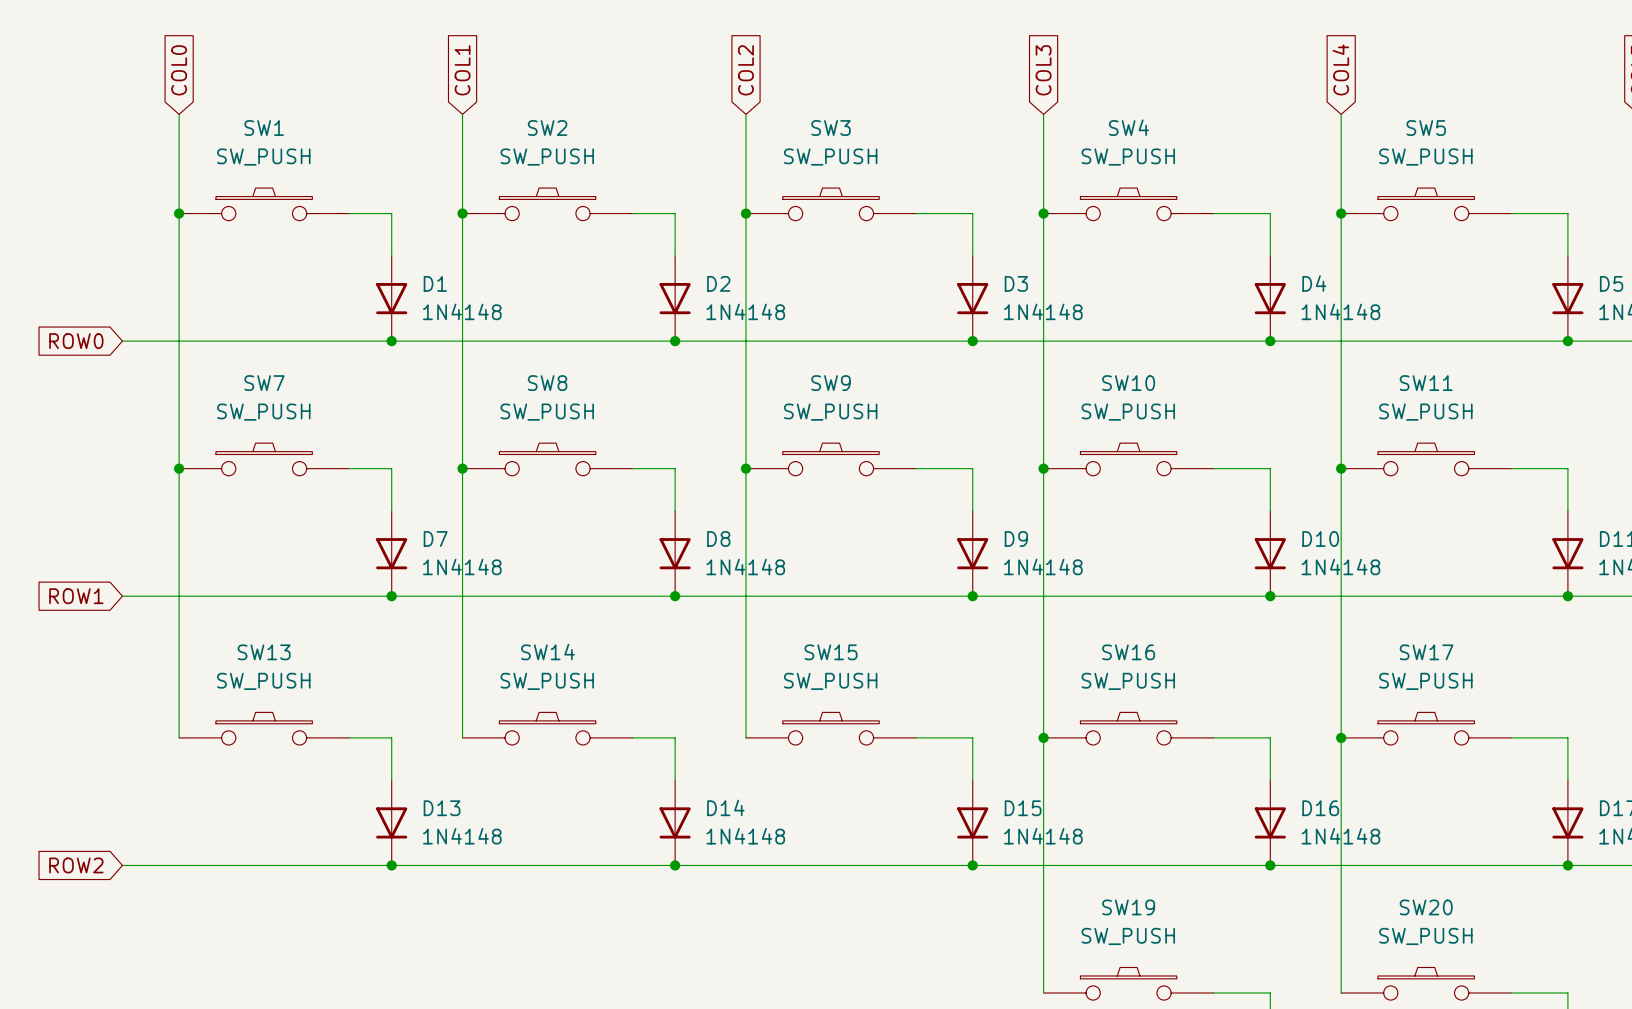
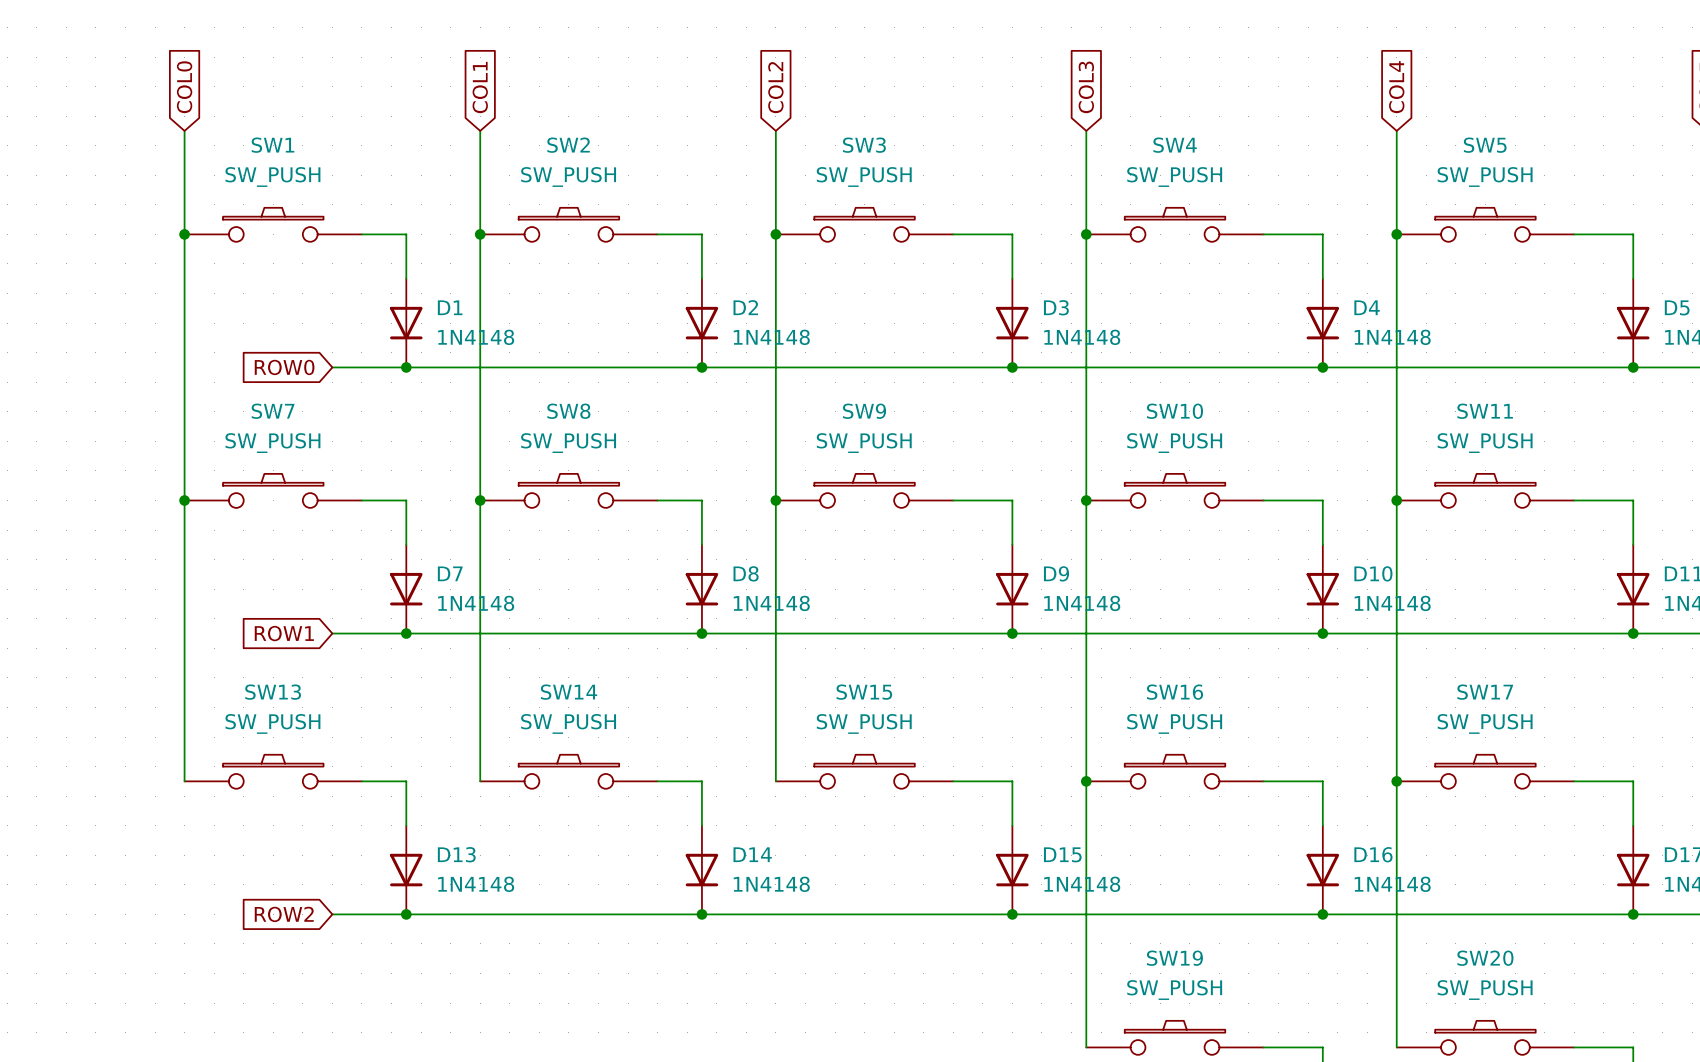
global label position: ROW0 (76, 341) -> ROW0 (284, 367)
wire: (122, 341) (320, 341) -> none
global label position: ROW1 (76, 596) -> ROW1 (284, 633)
wire: (122, 596) (320, 596) -> none
global label position: ROW2 (76, 865) -> ROW2 (284, 914)
wire: (122, 865) (320, 865) -> none

